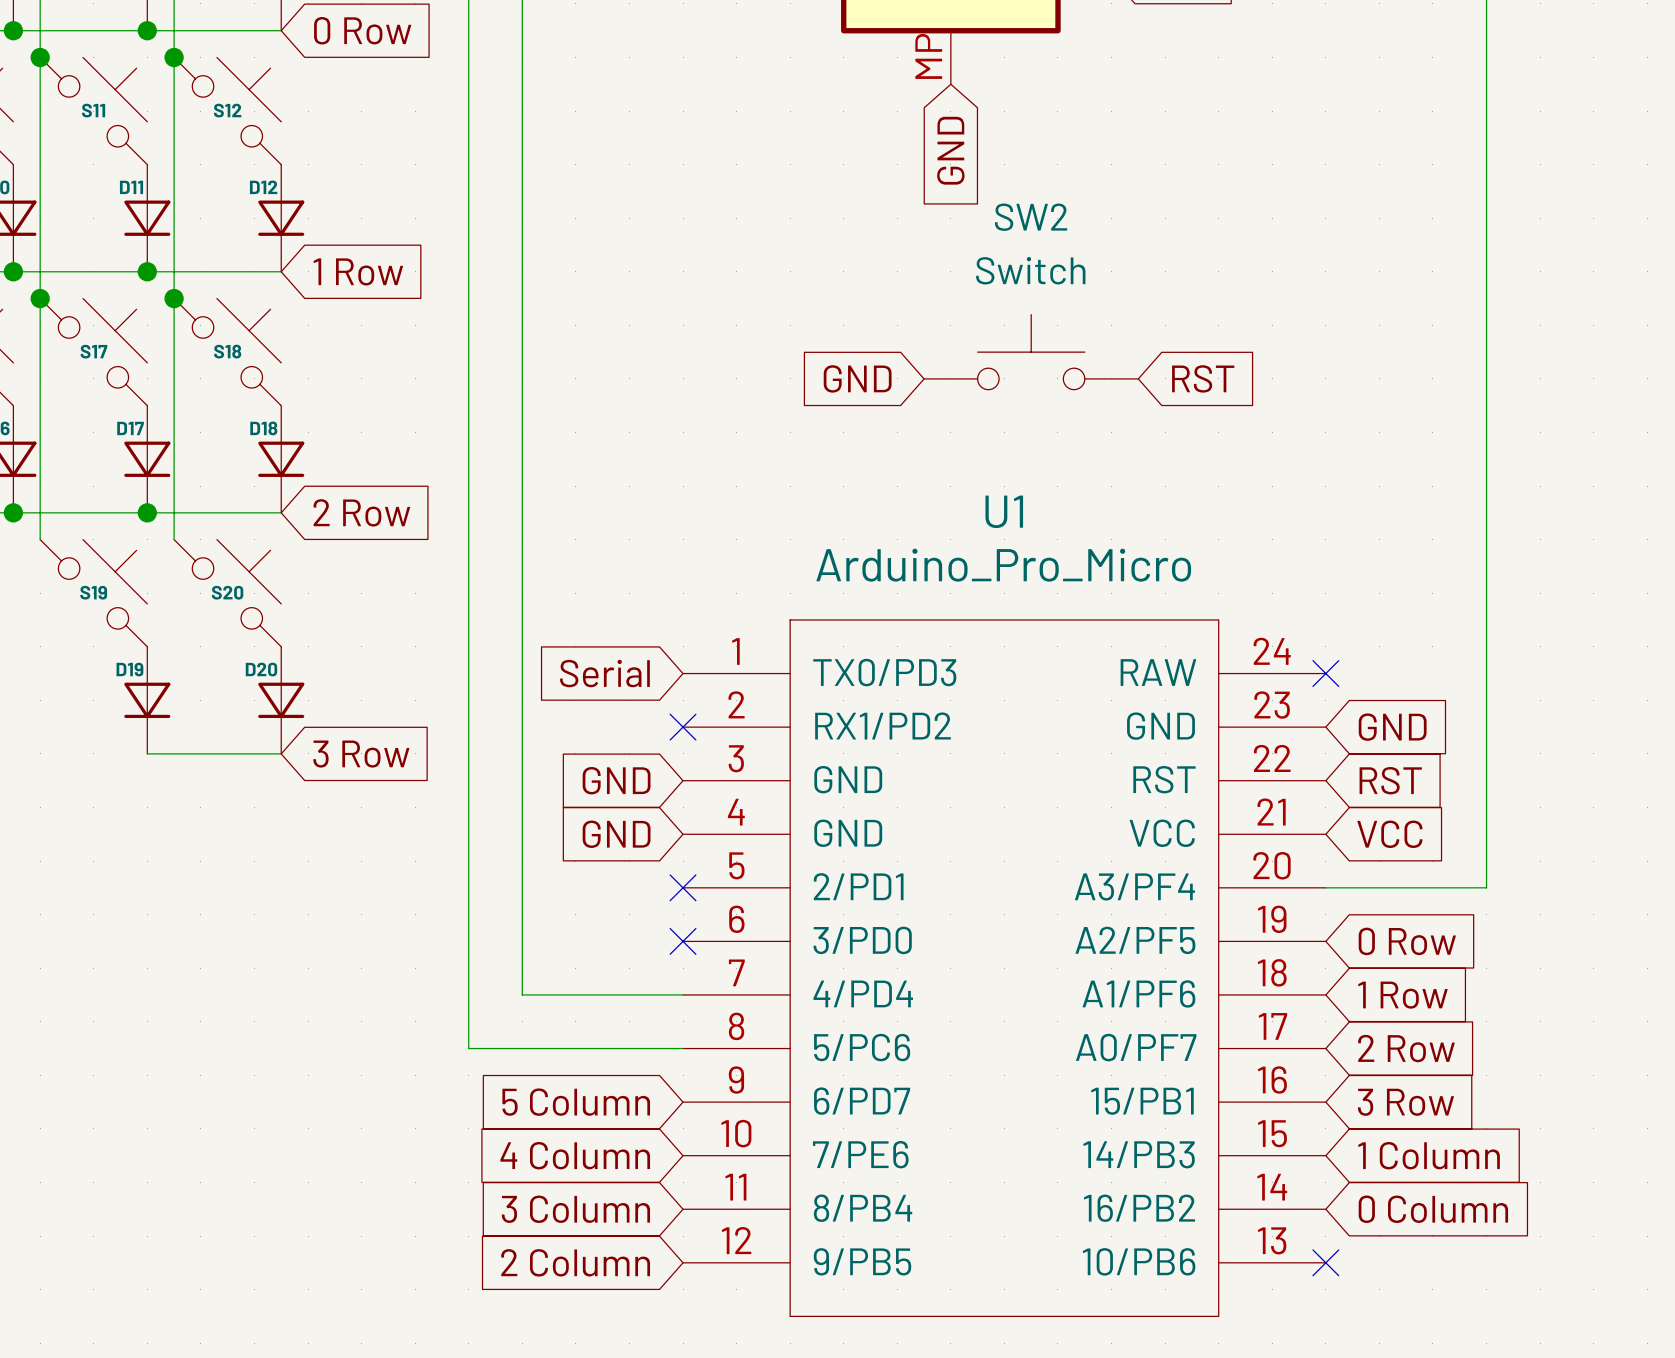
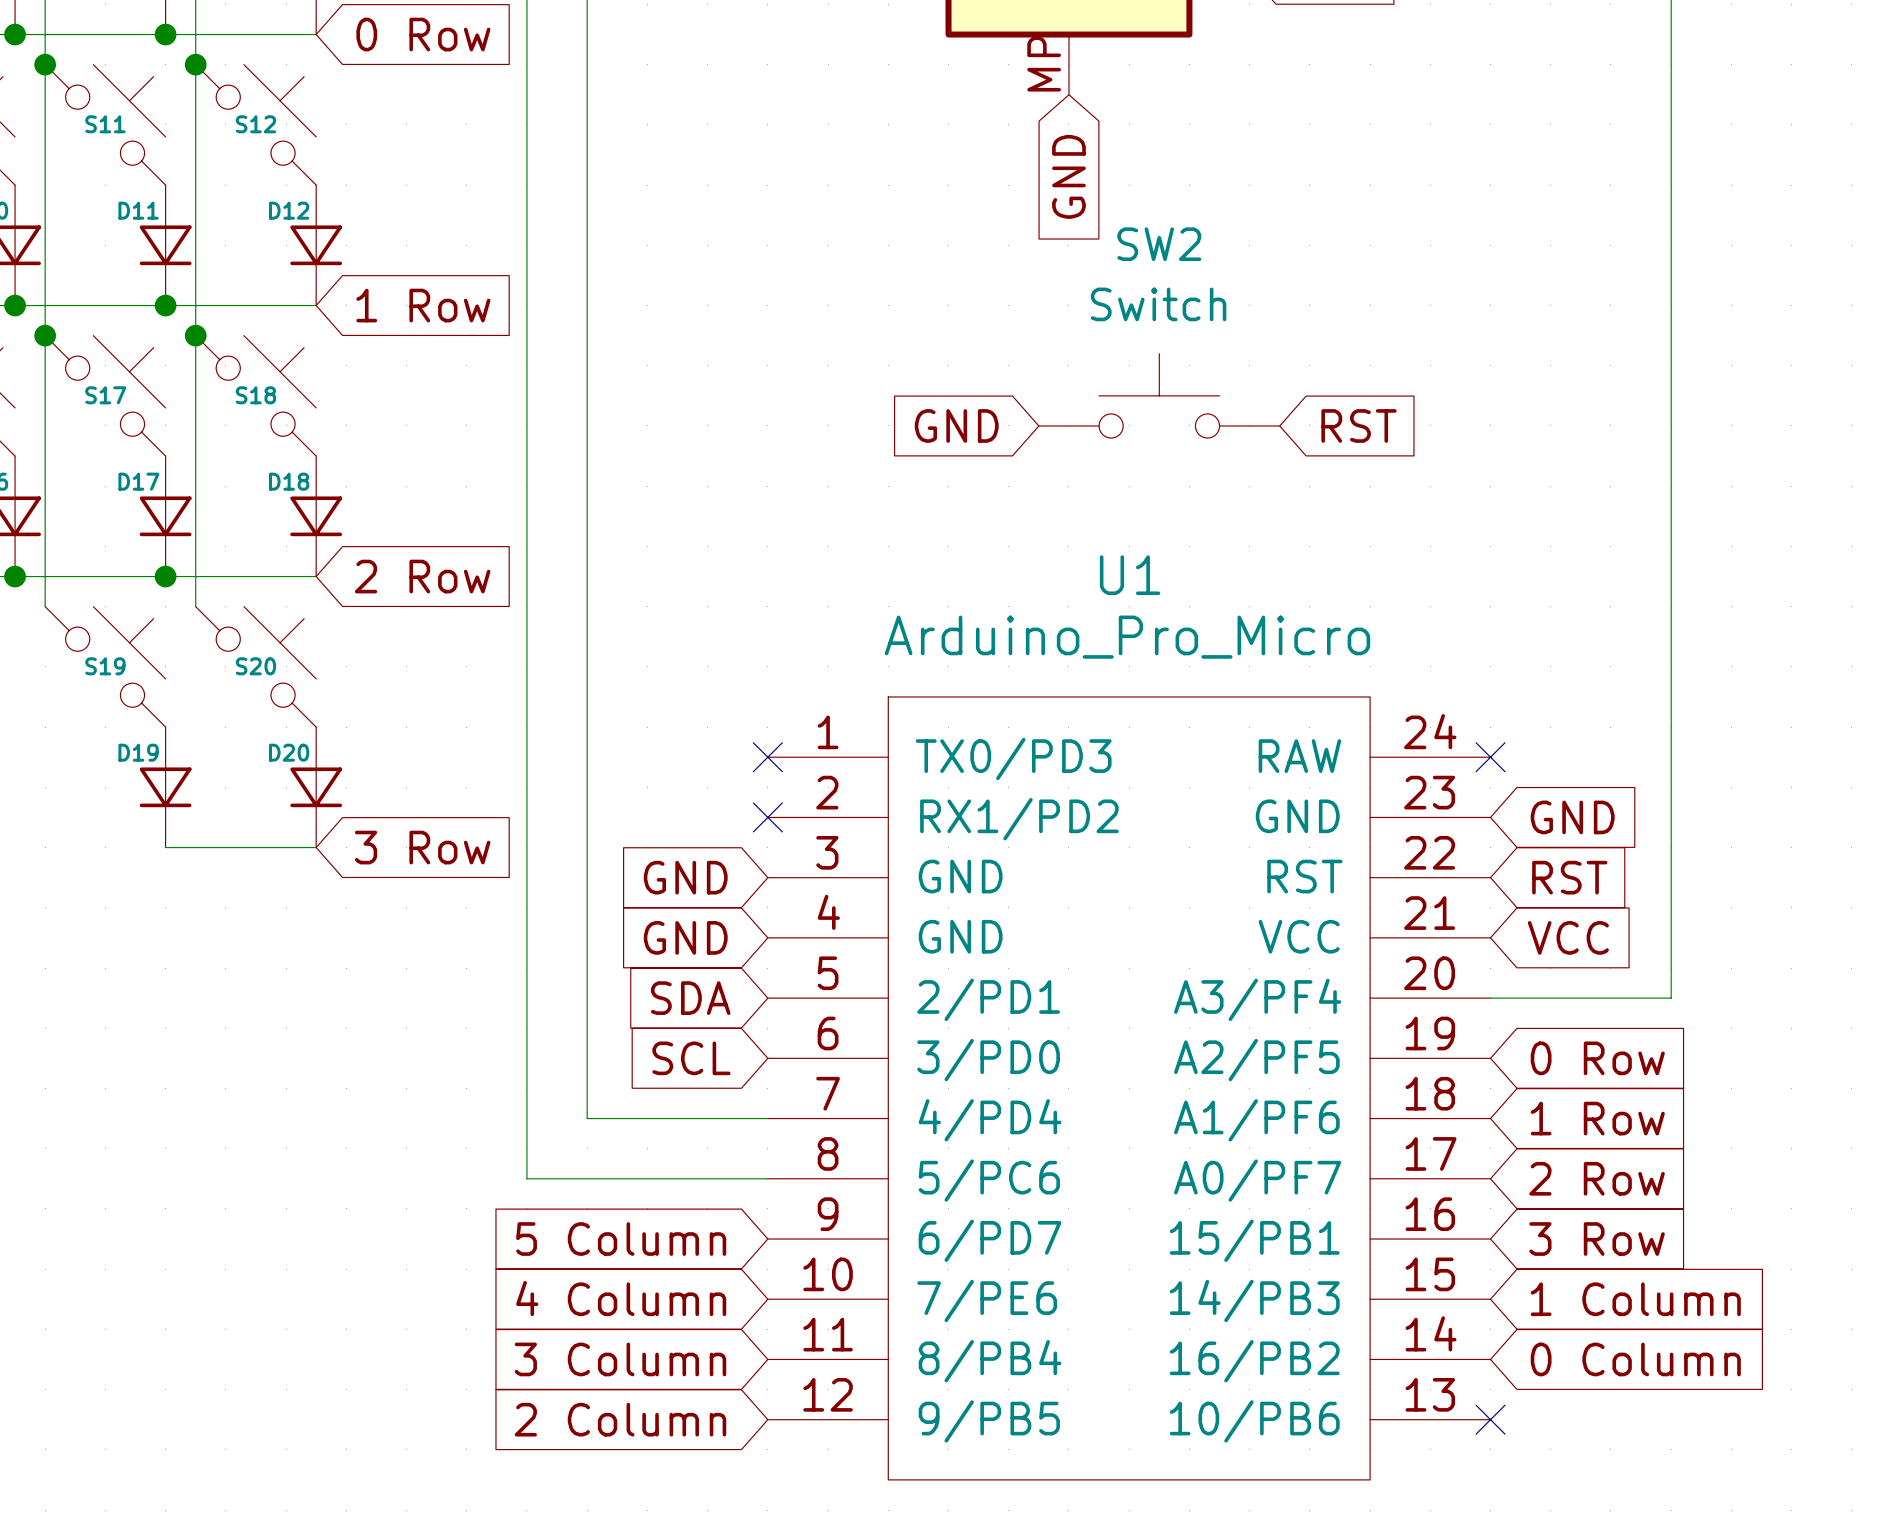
global label: Serial (604, 673) -> none
no-connect mark: none -> (767, 757)
global label: none -> SDA (690, 998)
no-connect mark: (683, 887) -> none
global label: none -> SCL (691, 1058)
no-connect mark: (683, 941) -> none

